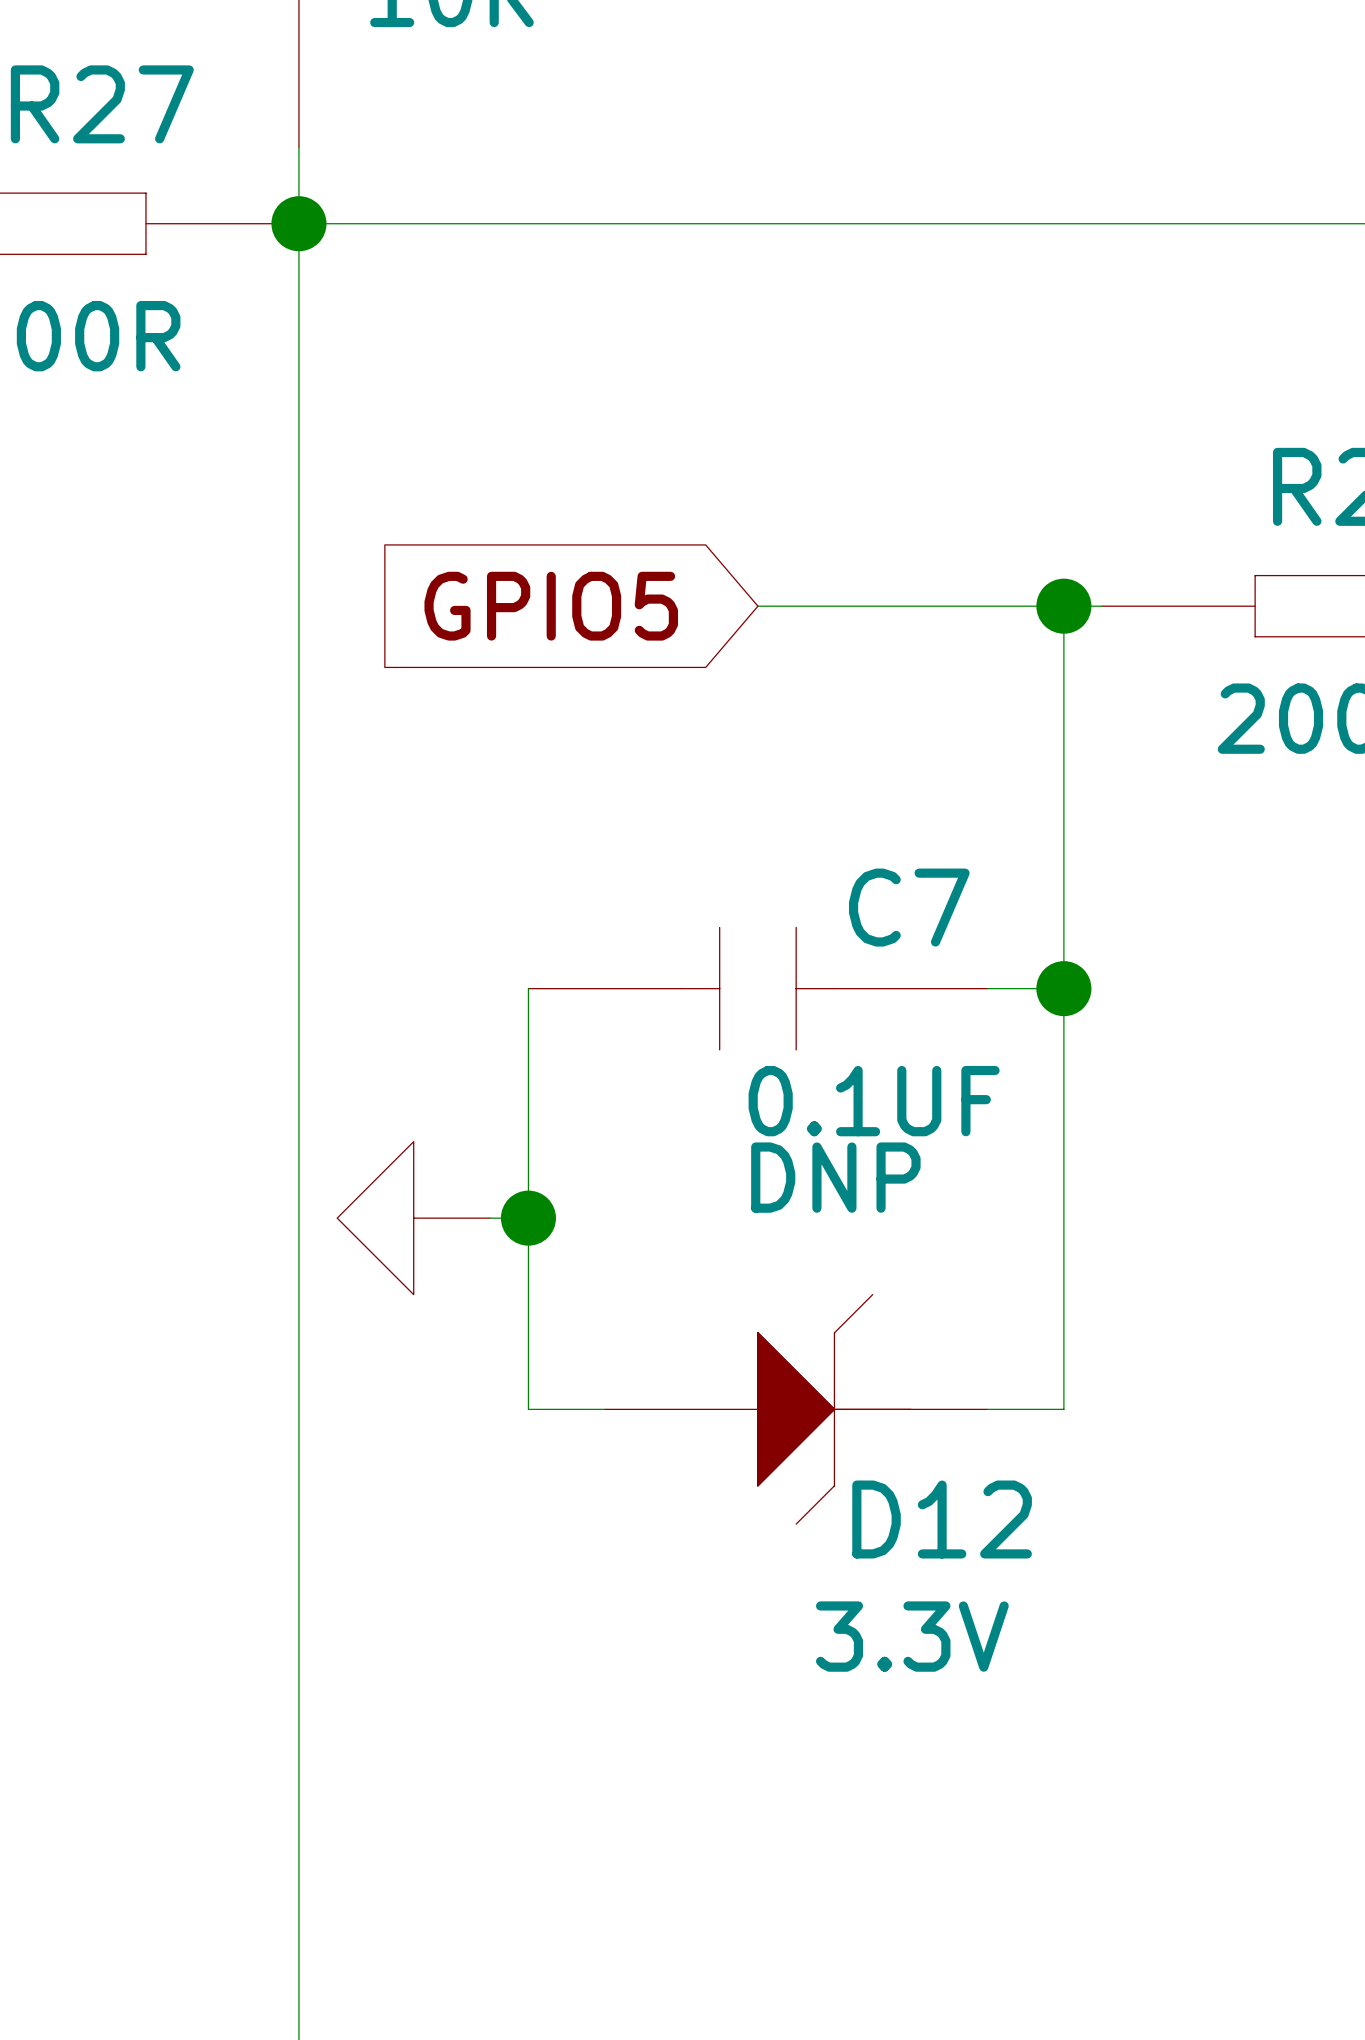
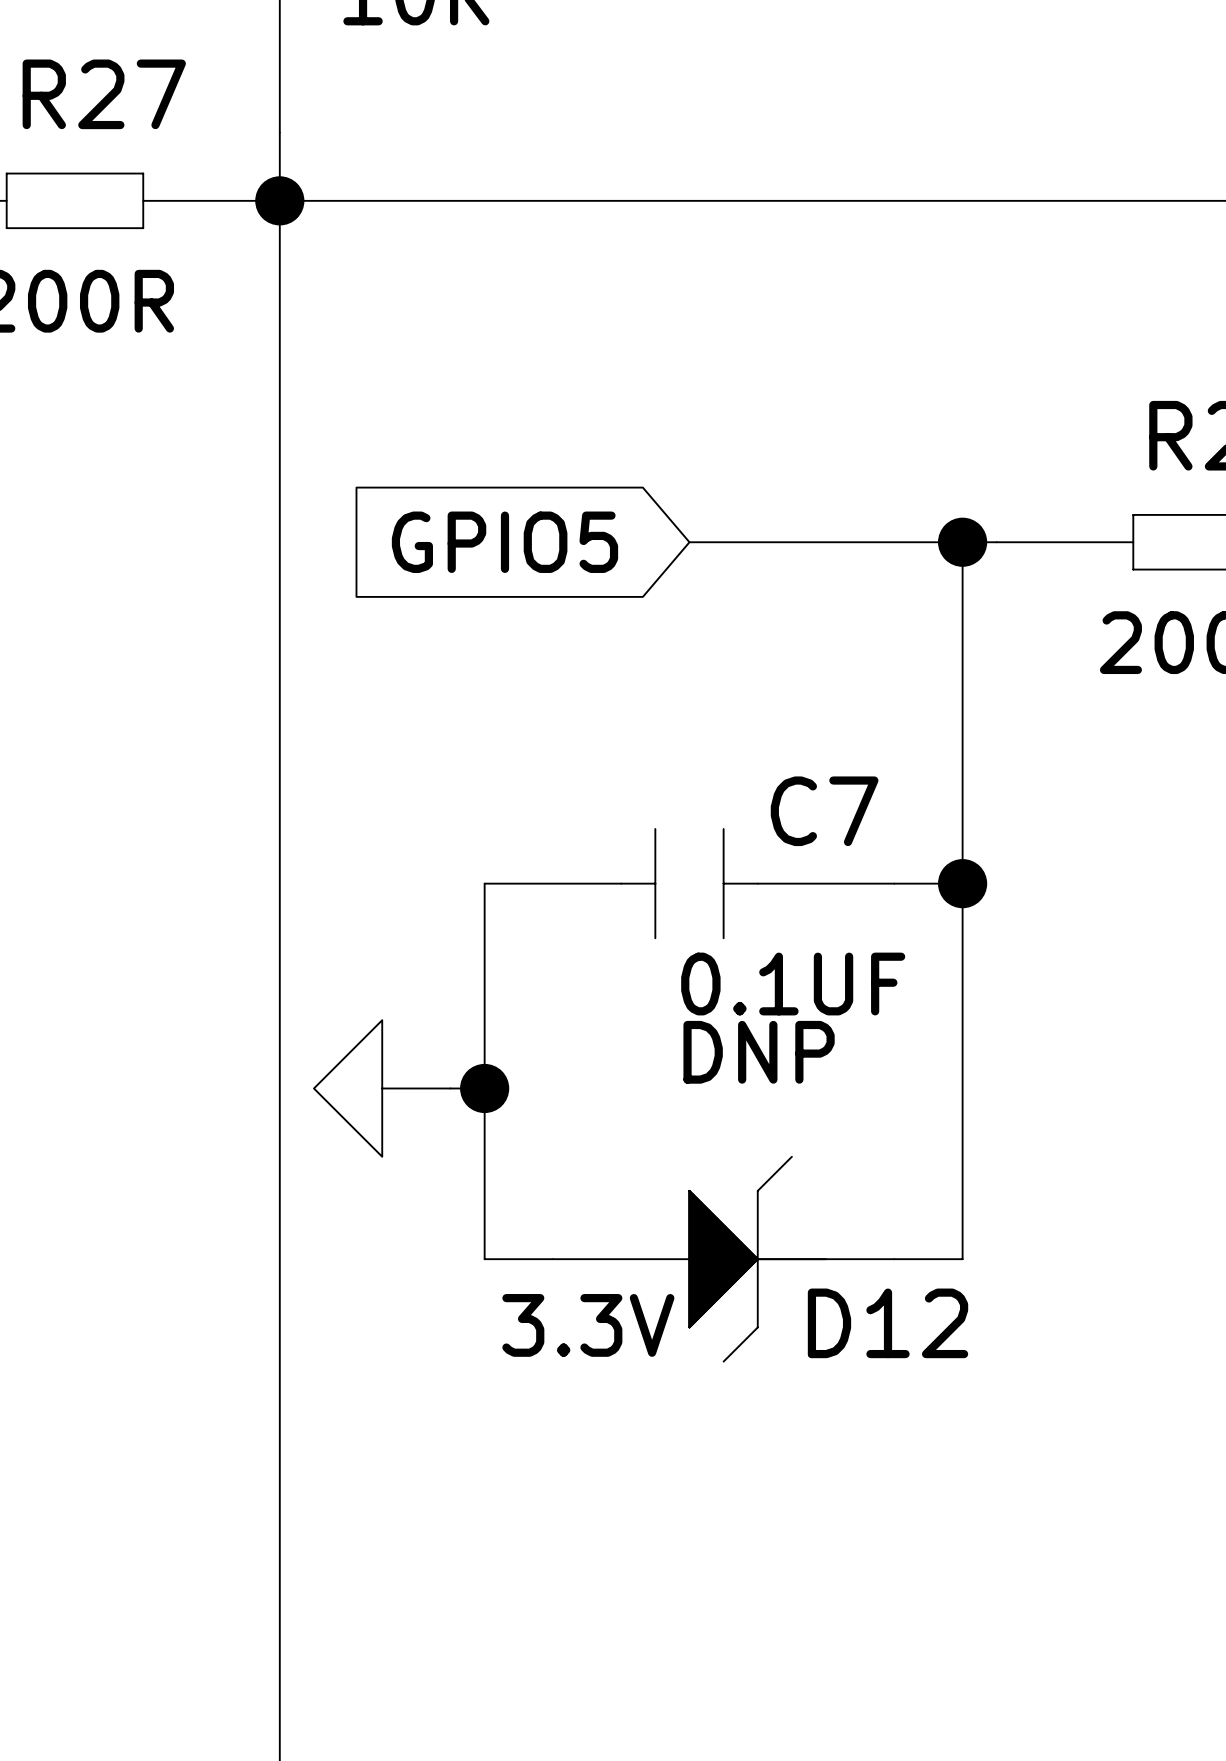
D12 name position: D12 (942, 1519) -> D12 (888, 1323)
D12 text position: 3.3V (912, 1636) -> 3.3V (588, 1325)

